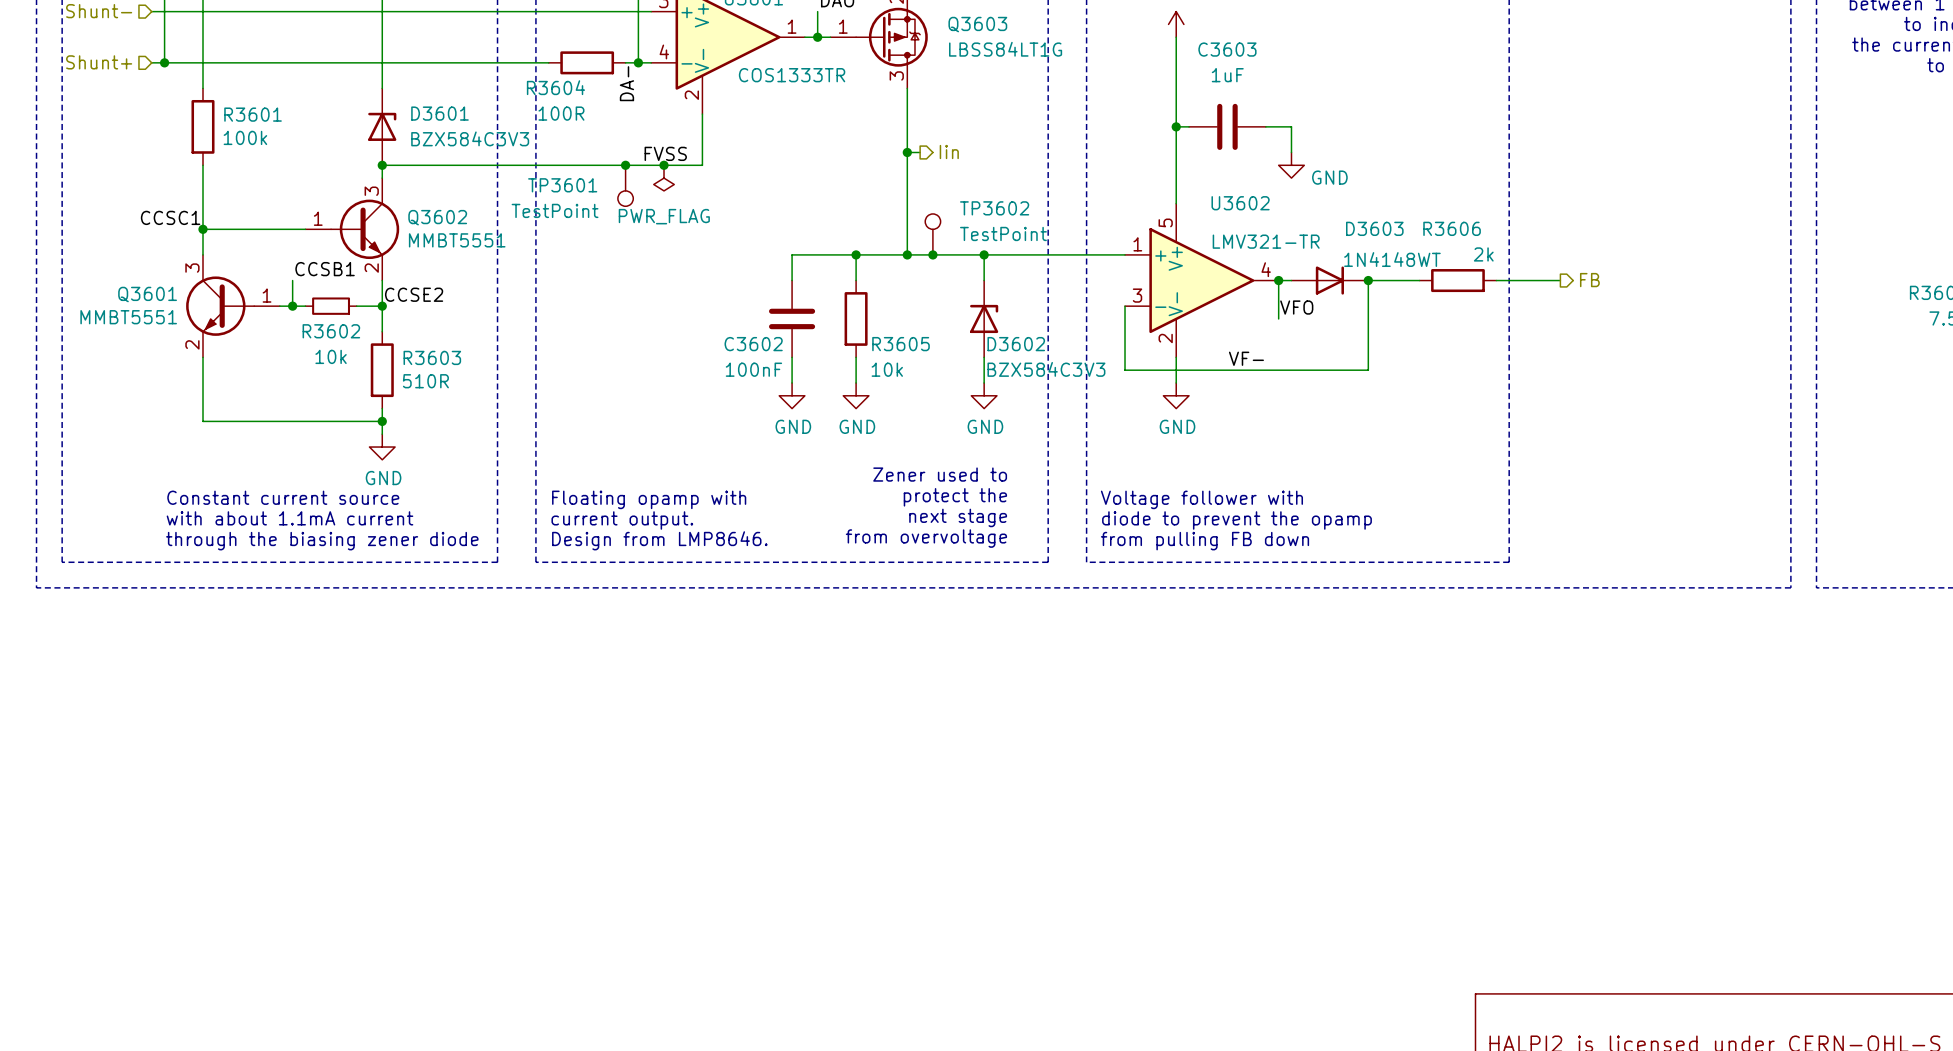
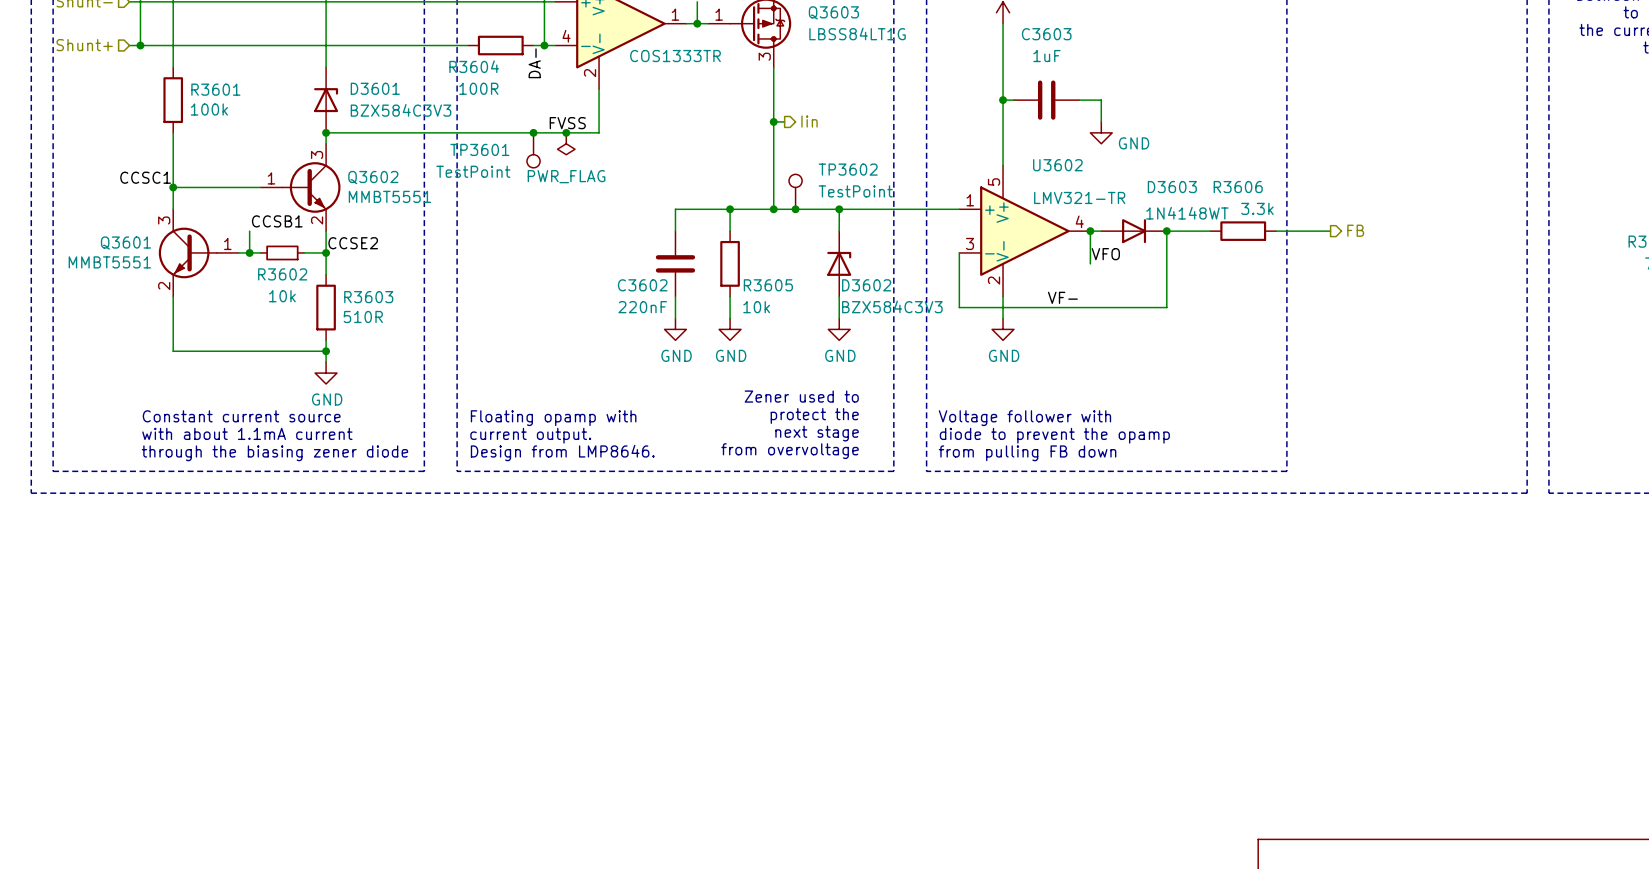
R3606 value: 2k (1483, 254) -> 3.3k (1257, 208)
C3602 value: 100nF (753, 369) -> 220nF (642, 307)

